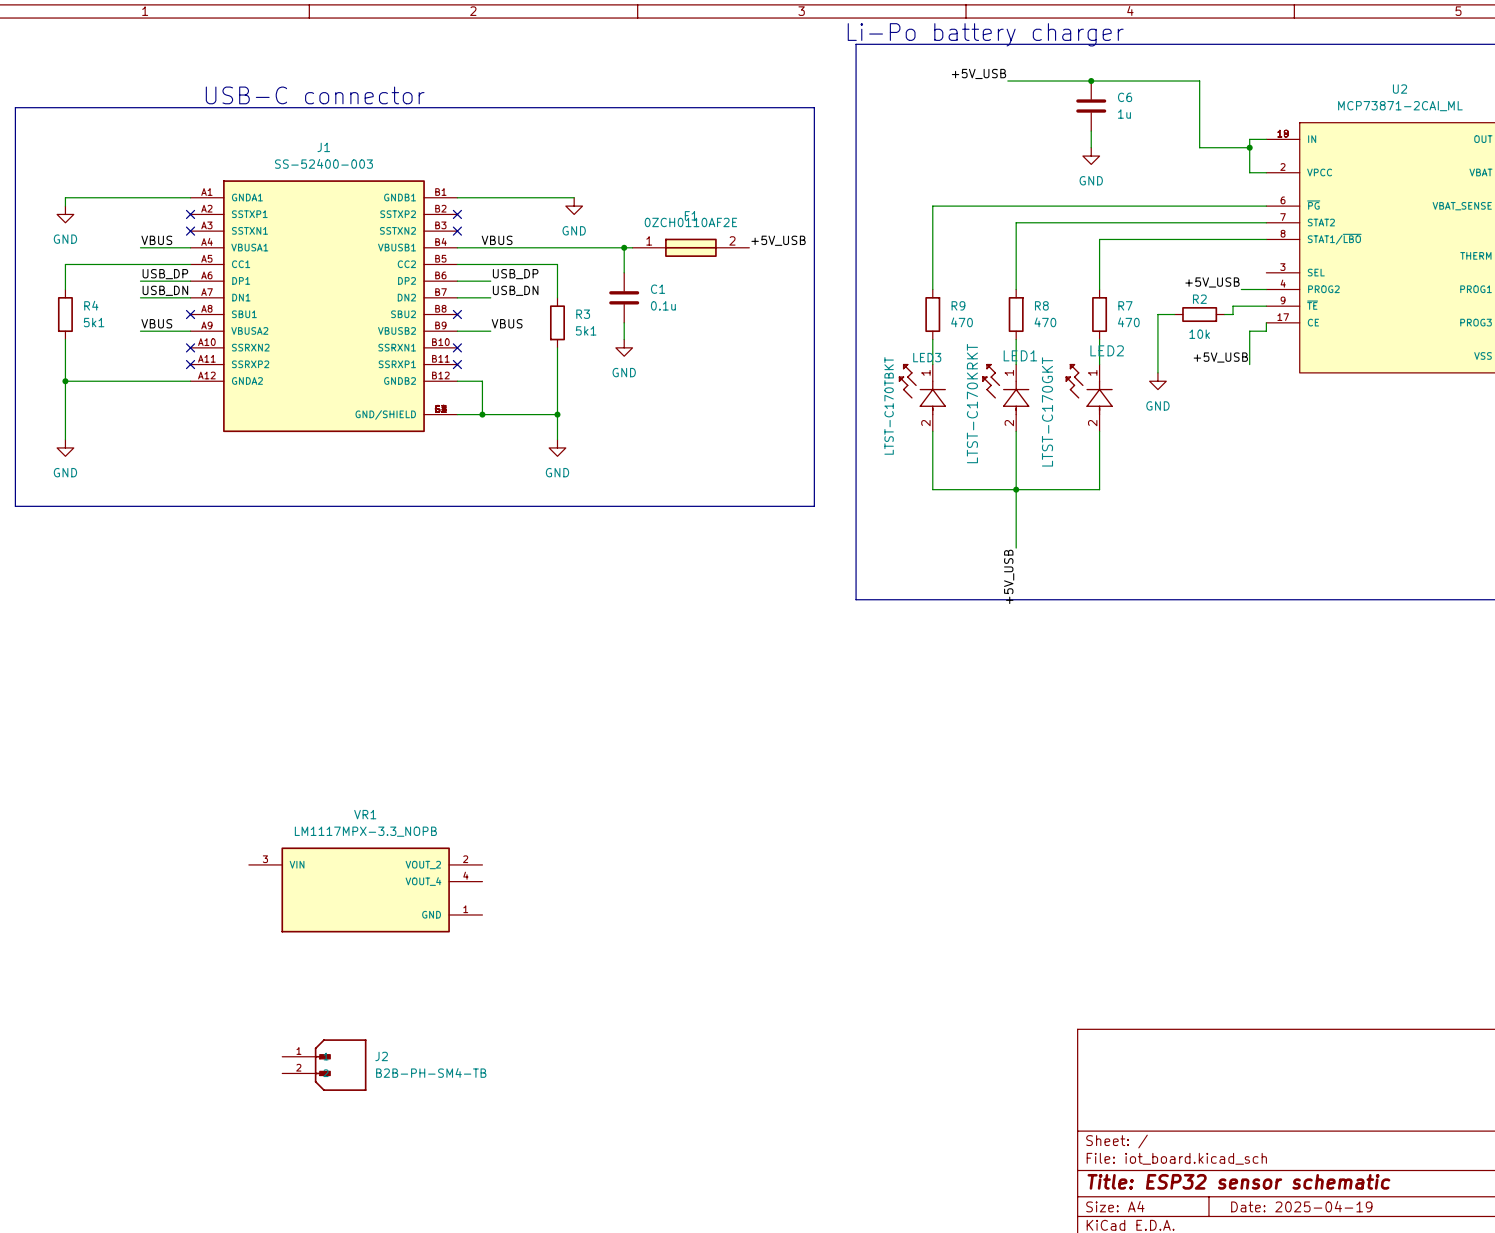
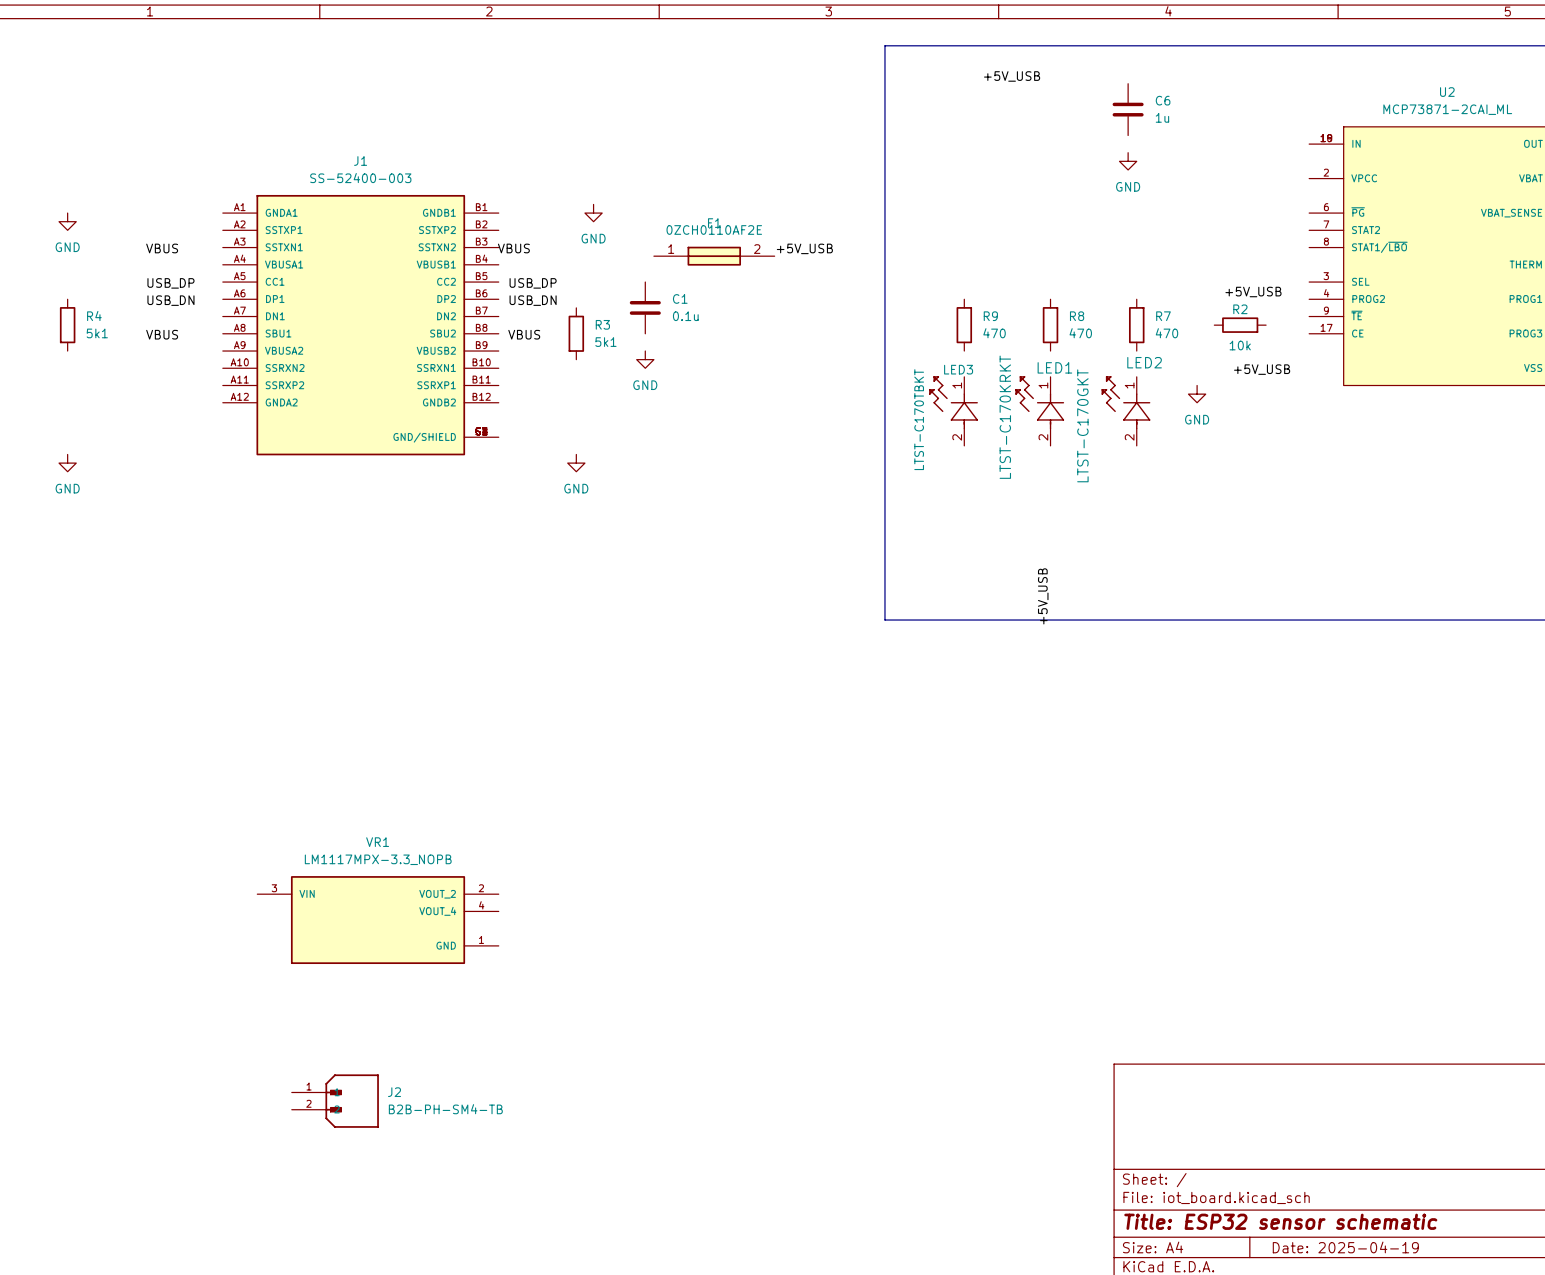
text: Li-Po battery charger (985, 34) -> none
wire: (1007, 81) (1199, 81) (1199, 147) (1249, 147) -> none
junction: (1091, 81) -> none
text: USB-C connector (315, 95) -> none
line: (15, 107) (15, 506) (814, 506) (814, 107) (15, 107) -> none
wire: (1091, 131) (1091, 147) -> none
wire: (1266, 139) (1249, 139) (1249, 172) (1266, 172) -> none
junction: (1249, 147) -> none
wire: (190, 197) (65, 197) (65, 206) -> none
wire: (457, 197) (574, 197) -> none
wire: (1266, 206) (932, 206) (932, 289) -> none
no-connect mark: (190, 214) -> none
no-connect mark: (457, 214) -> none
wire: (1266, 222) (1016, 222) (1016, 289) -> none
no-connect mark: (190, 231) -> none
no-connect mark: (457, 231) -> none
wire: (1266, 239) (1099, 239) (1099, 289) -> none
wire: (140, 247) (190, 247) -> none
wire: (457, 247) (632, 247) -> none
wire: (624, 247) (624, 272) -> none
junction: (624, 247) -> none
wire: (190, 264) (65, 264) (65, 289) -> none
wire: (457, 264) (557, 264) (557, 297) -> none
wire: (140, 281) (190, 281) -> none
wire: (457, 281) (490, 281) -> none
wire: (1241, 289) (1266, 289) -> none
wire: (140, 297) (190, 297) -> none
wire: (457, 297) (490, 297) -> none
J1 position: (323, 306) -> (360, 325)
wire: (1266, 306) (1233, 306) (1233, 314) (1224, 314) -> none
no-connect mark: (190, 314) -> none
no-connect mark: (457, 314) -> none
wire: (1174, 314) (1157, 314) (1157, 372) -> none
wire: (624, 322) (624, 339) -> none
wire: (1266, 322) (1266, 331) (1249, 331) (1249, 364) -> none
wire: (140, 331) (190, 331) -> none
wire: (457, 331) (490, 331) -> none
wire: (65, 339) (65, 439) -> none
wire: (932, 339) (932, 364) -> none
wire: (1016, 339) (1016, 364) -> none
wire: (1099, 339) (1099, 364) -> none
no-connect mark: (190, 347) -> none
no-connect mark: (457, 347) -> none
wire: (557, 347) (557, 439) -> none
no-connect mark: (190, 364) -> none
no-connect mark: (457, 364) -> none
wire: (65, 381) (190, 381) -> none
junction: (65, 381) -> none
wire: (457, 381) (482, 381) (482, 414) -> none
wire: (457, 414) (557, 414) -> none
junction: (482, 414) -> none
junction: (557, 414) -> none
wire: (932, 431) (932, 489) (1099, 489) (1099, 431) -> none
wire: (1016, 431) (1016, 548) -> none
junction: (1016, 489) -> none

